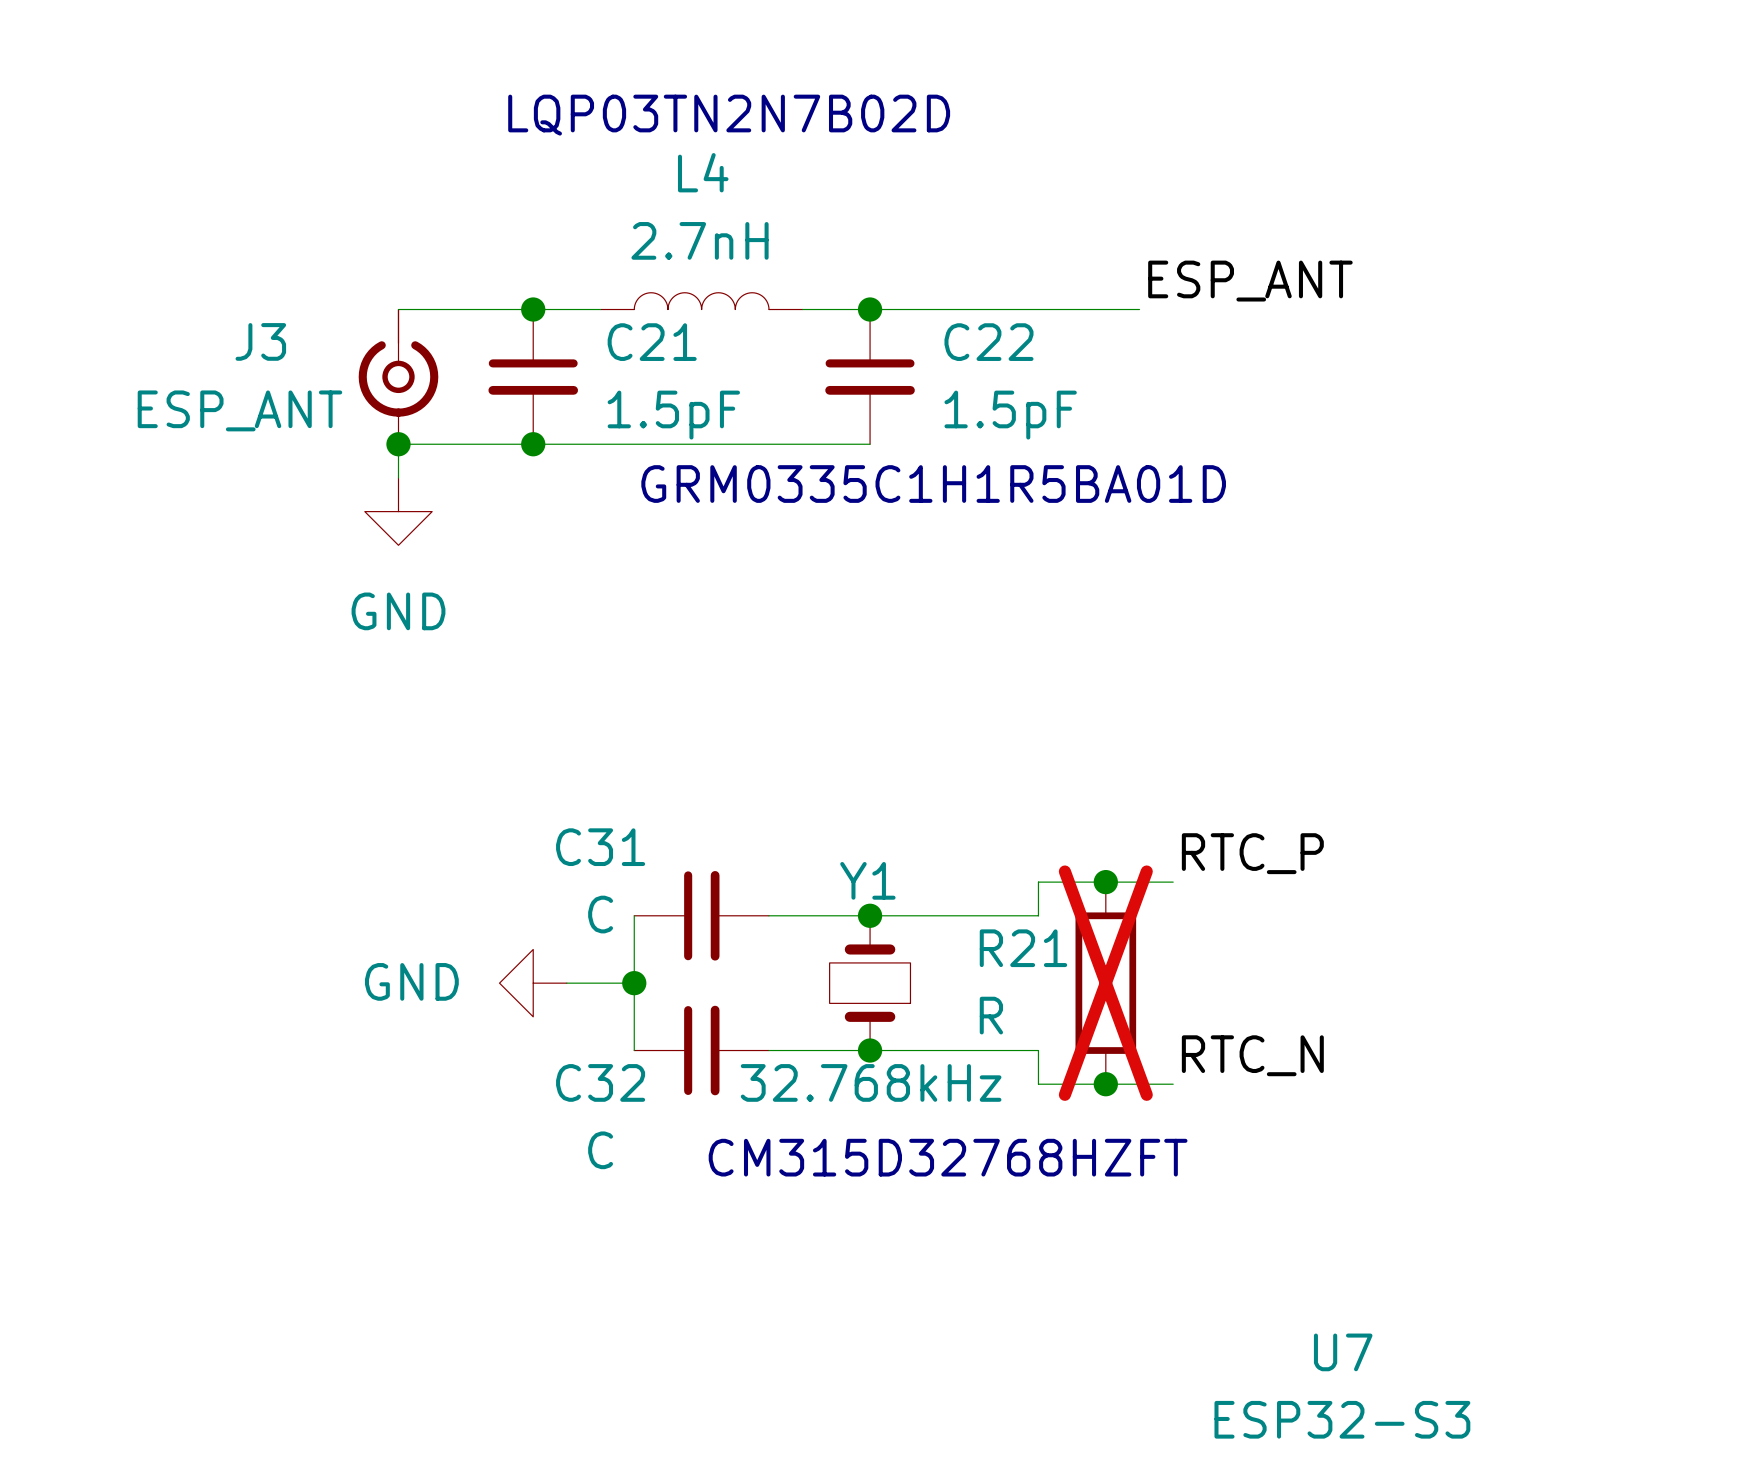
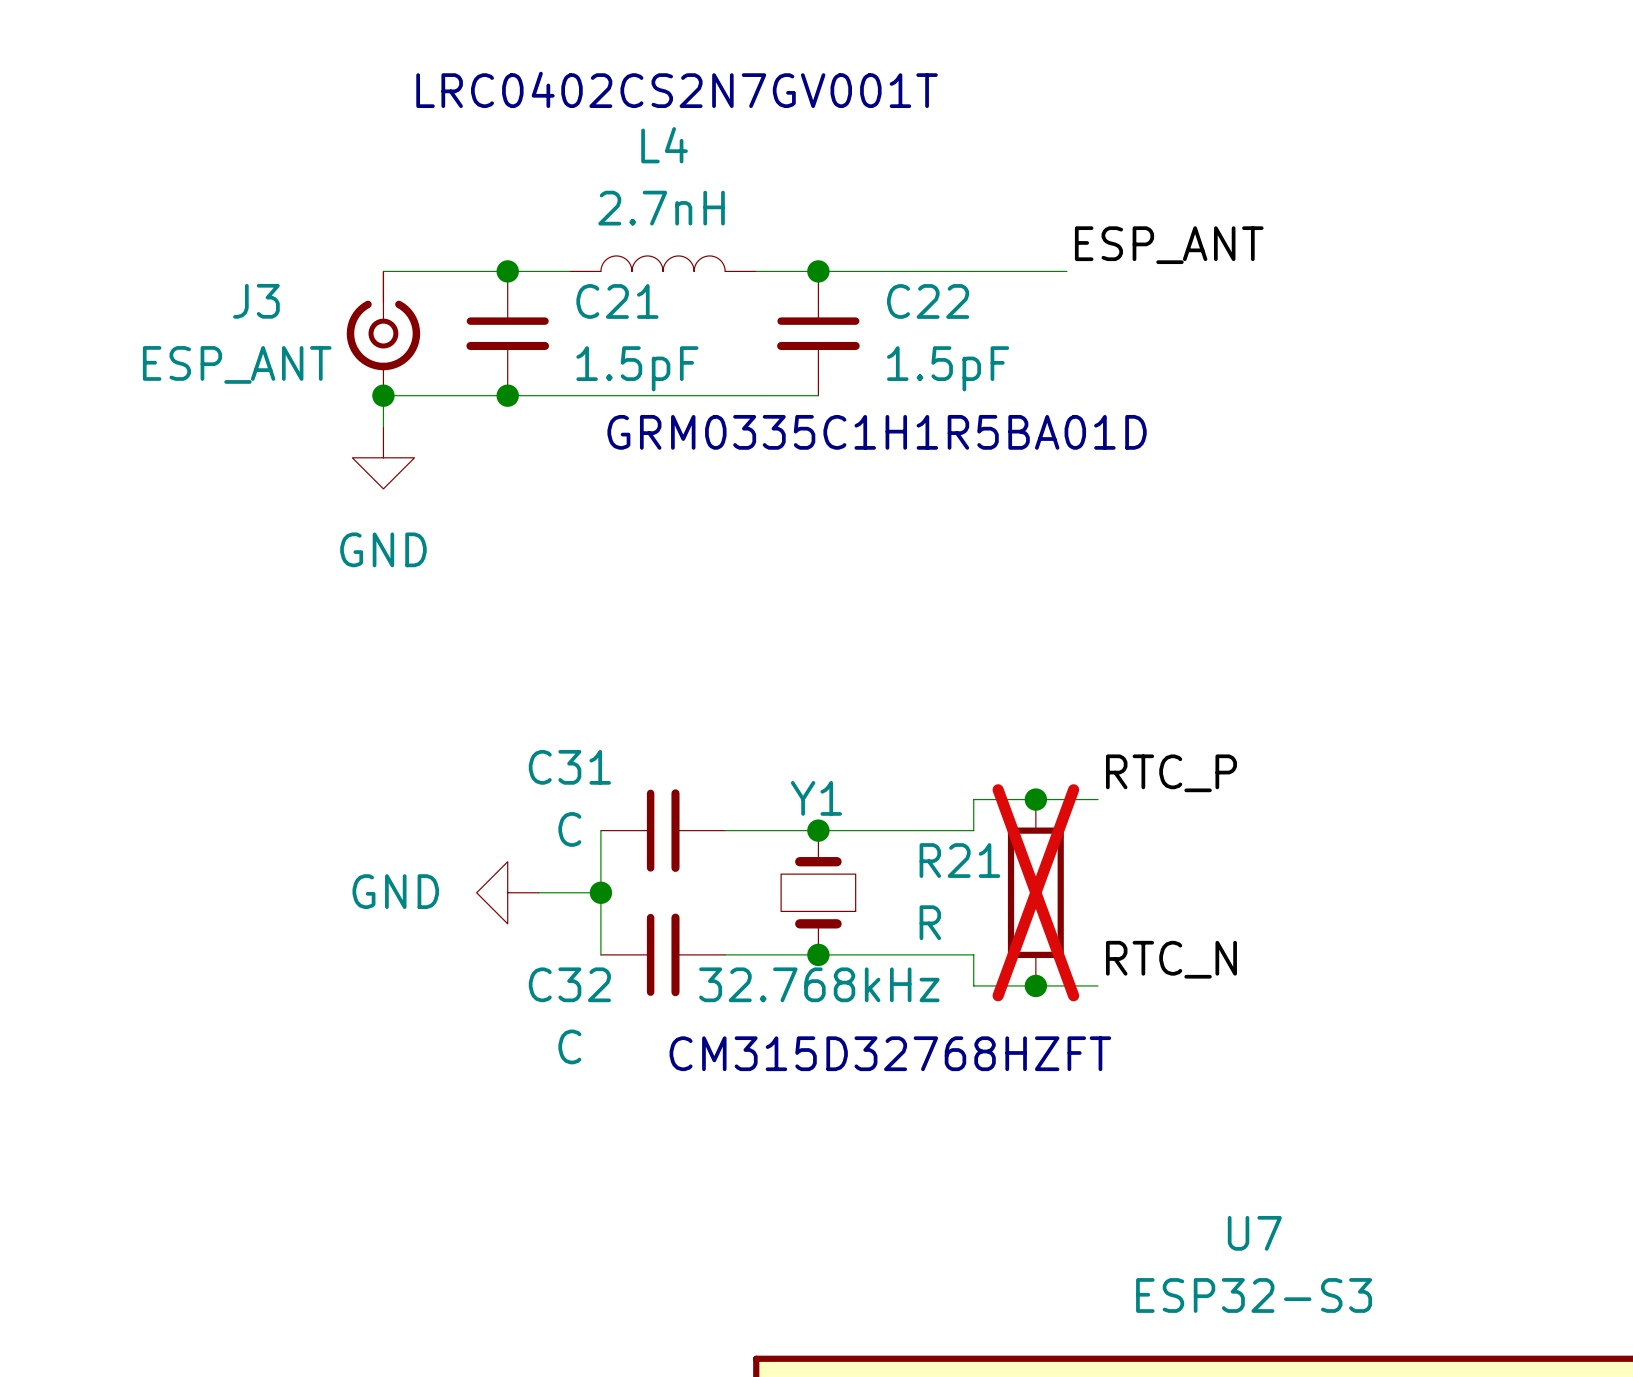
text: none -> LRC0402CS2N7GV001T (677, 89)
text: LQP03TN2N7B02D (729, 115) -> none

